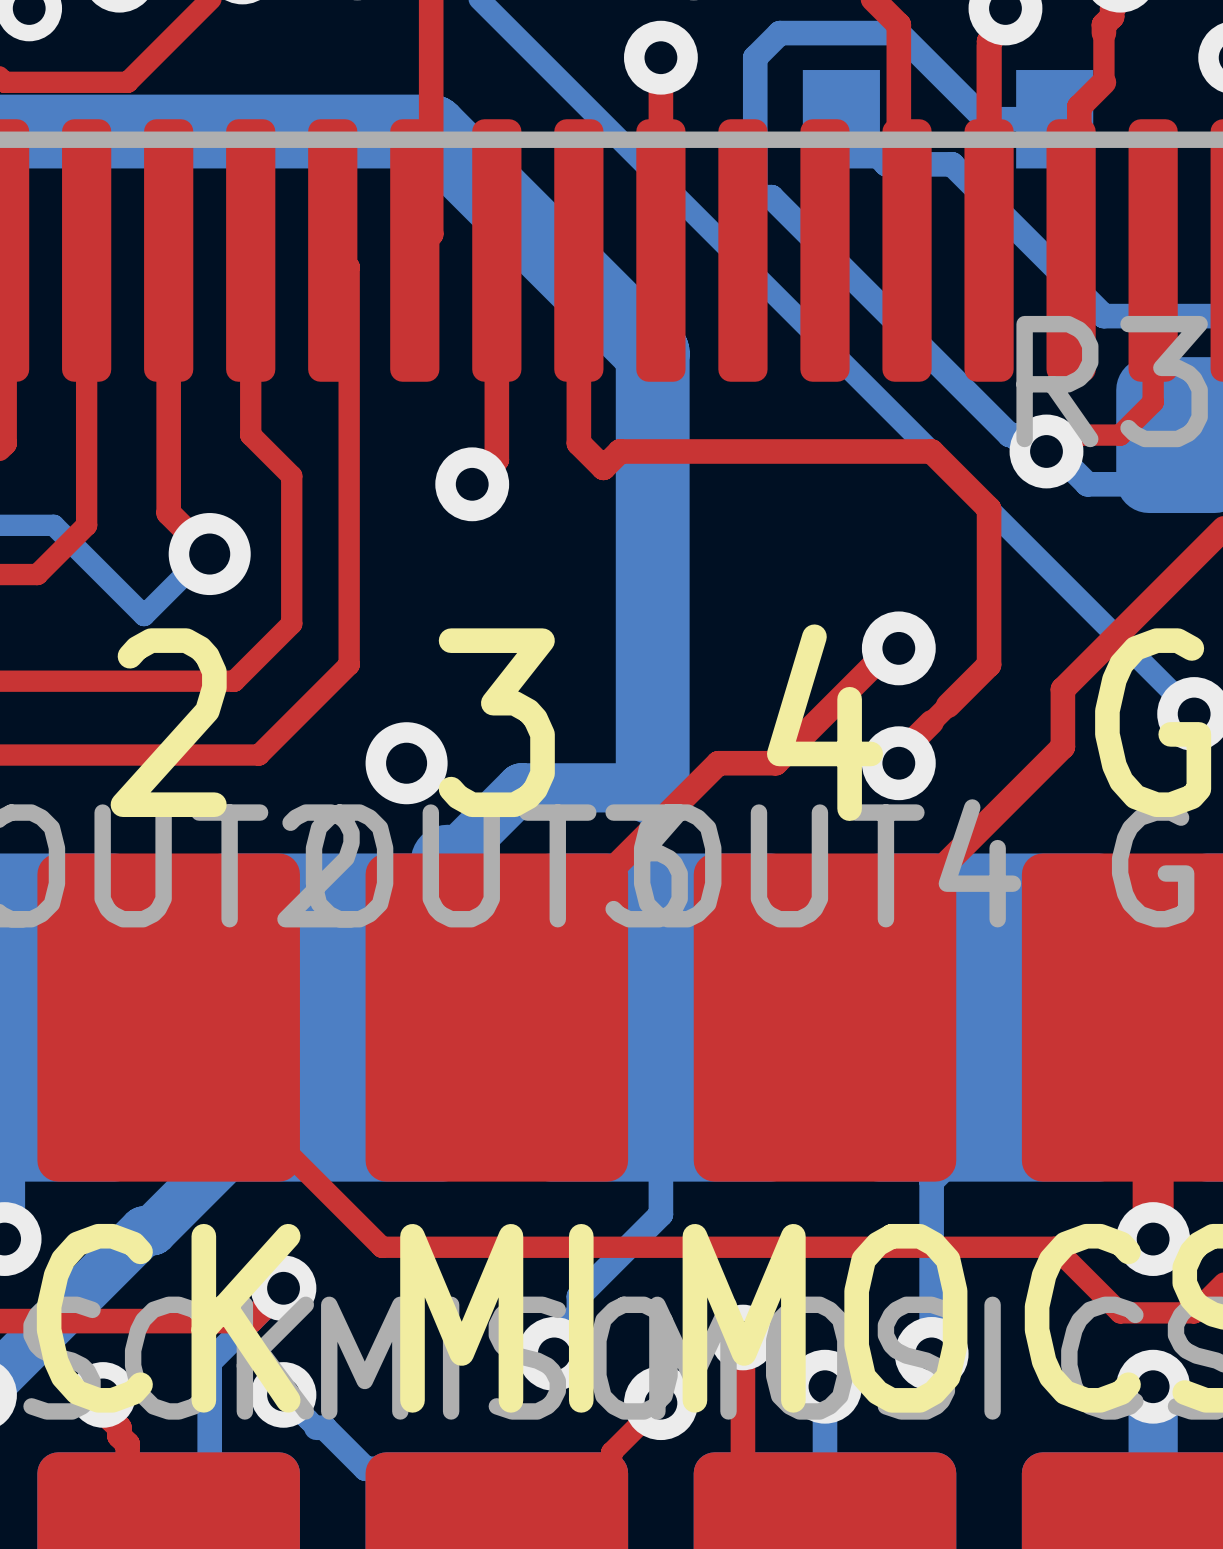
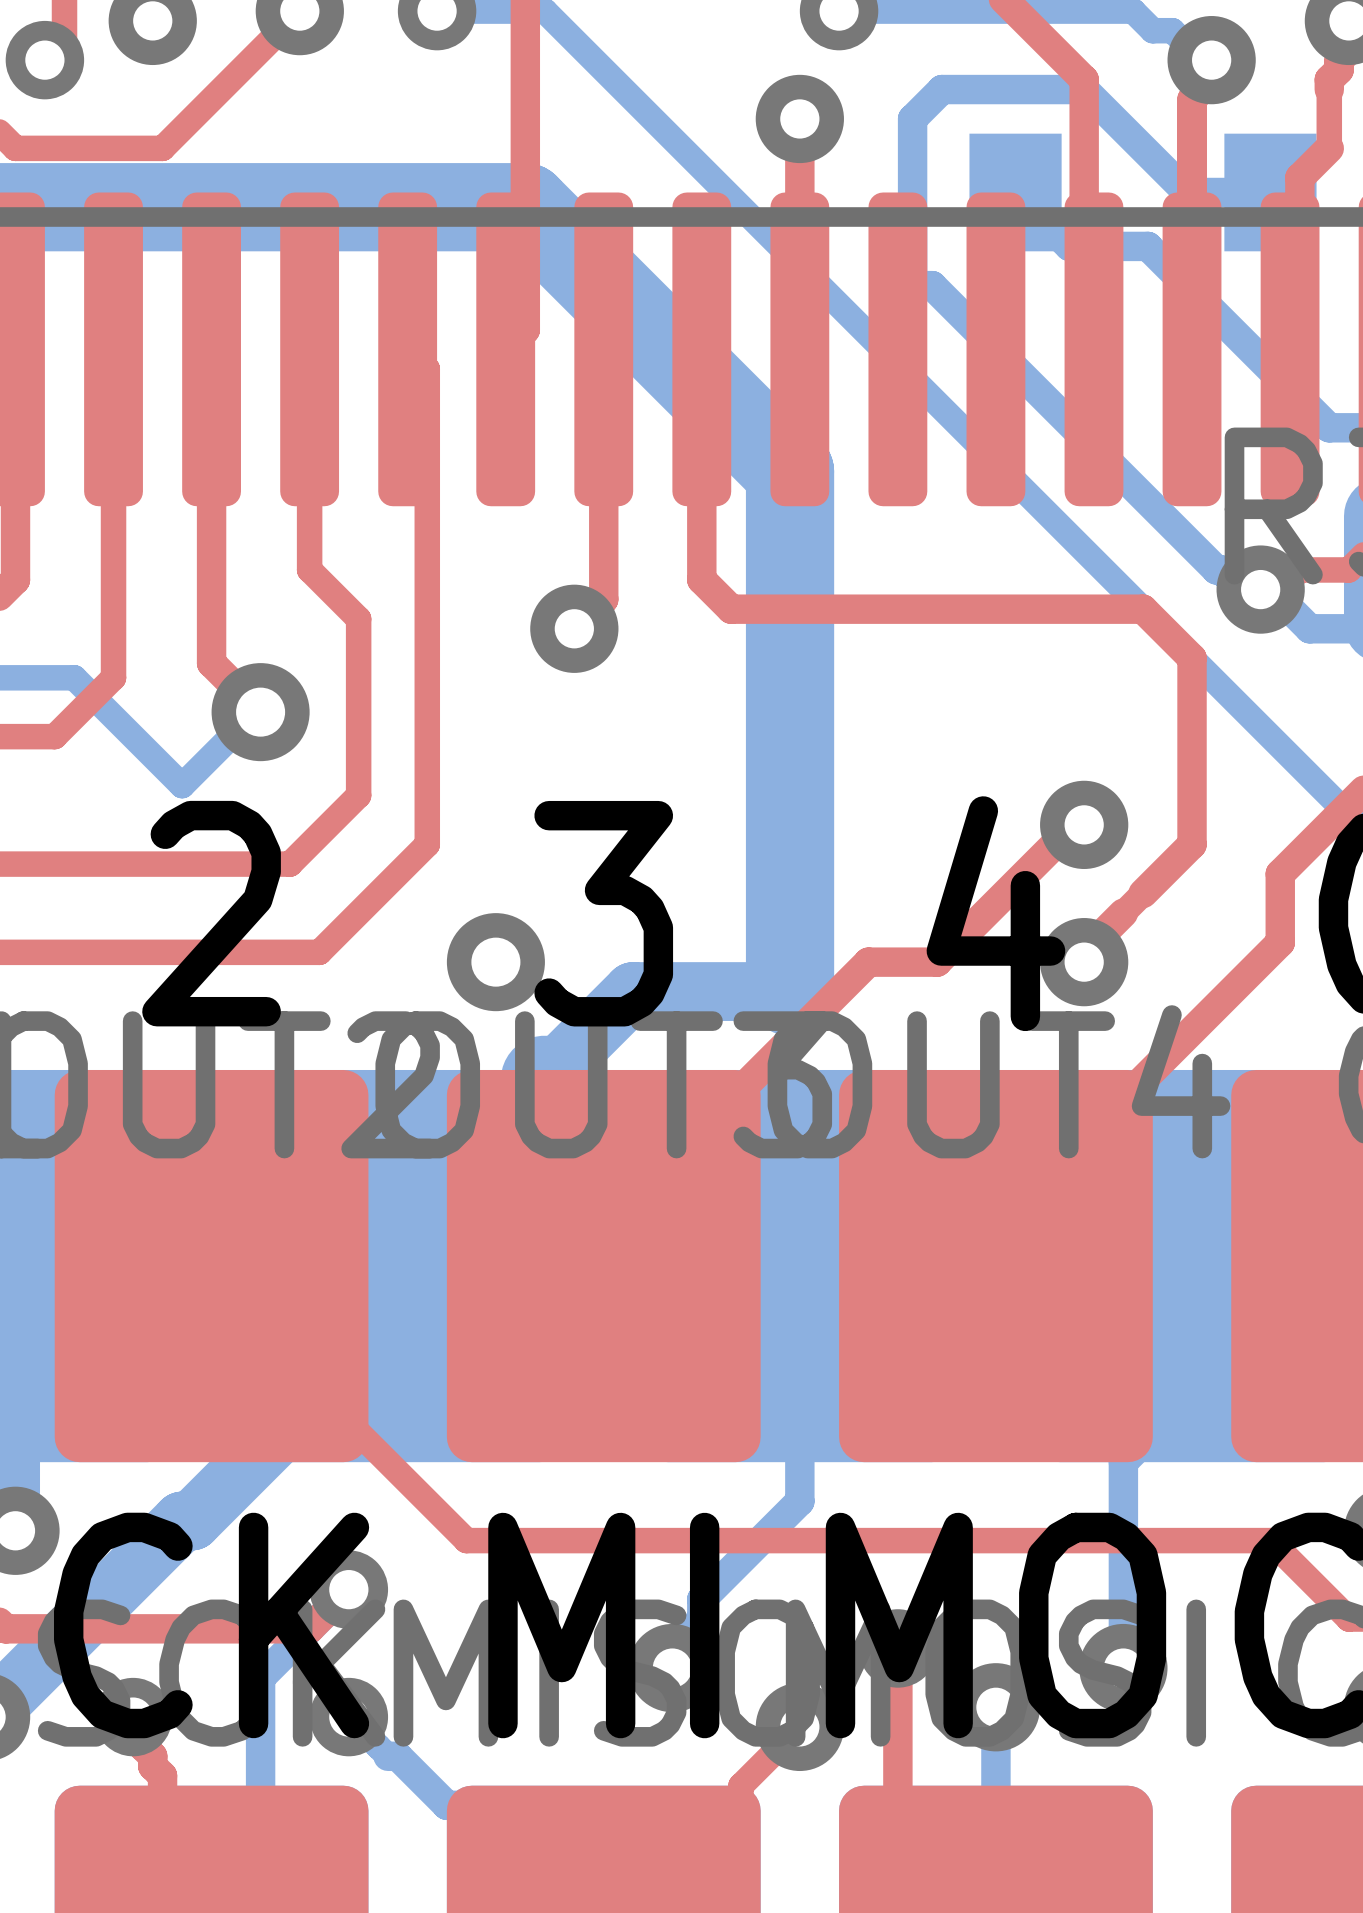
top track: (603, 467) (619, 451) (931, 451) (948, 467) -> (731, 609) (1143, 609)

